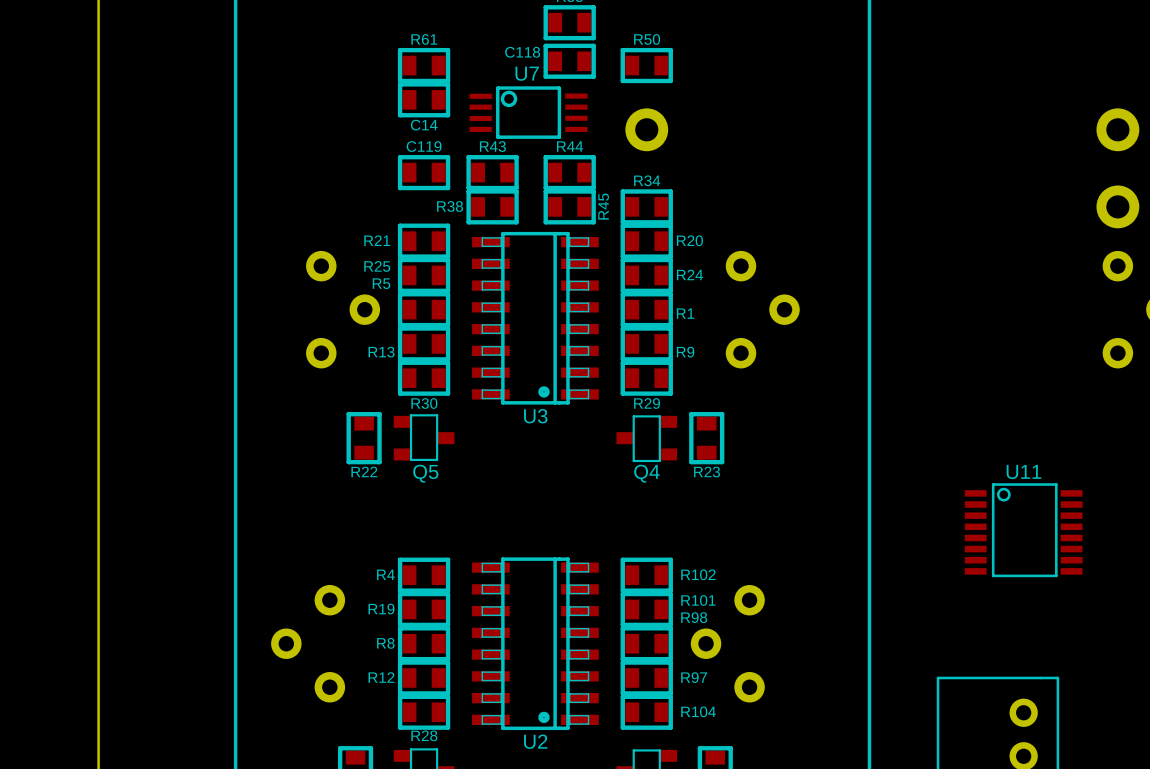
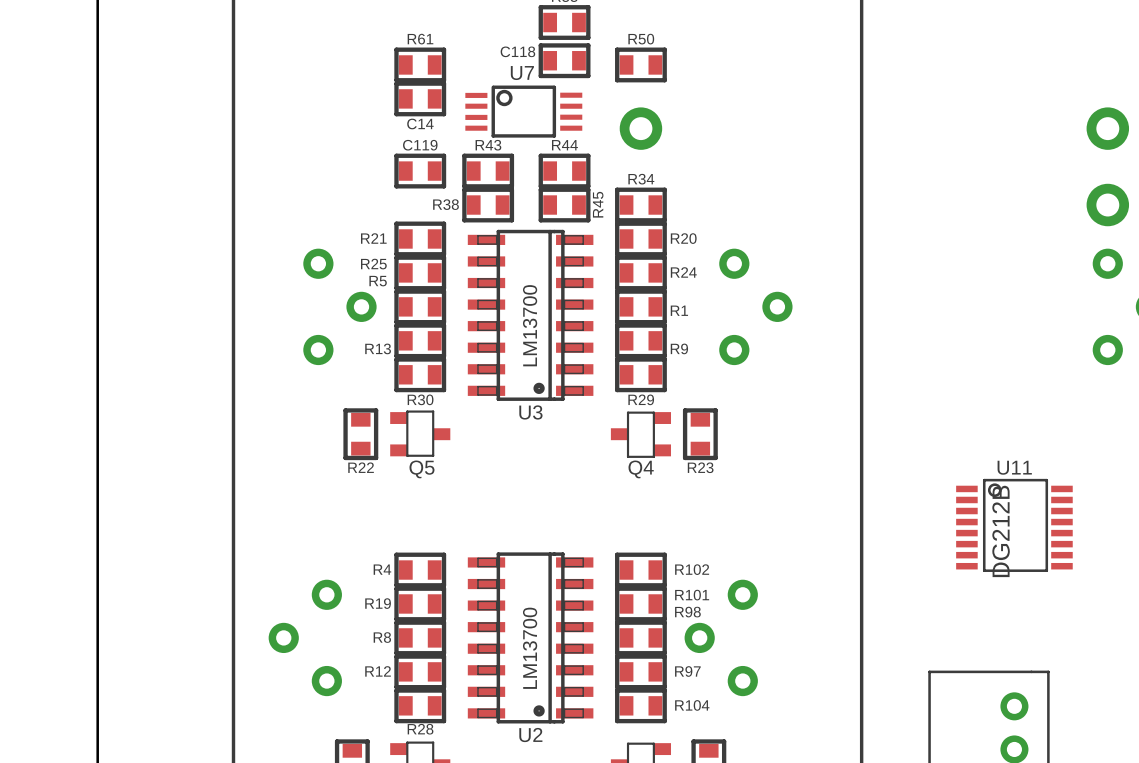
U3 value: none -> LM13700 (530, 325)
U11 value: none -> DG212B (1001, 531)
U2 value: none -> LM13700 (530, 648)

